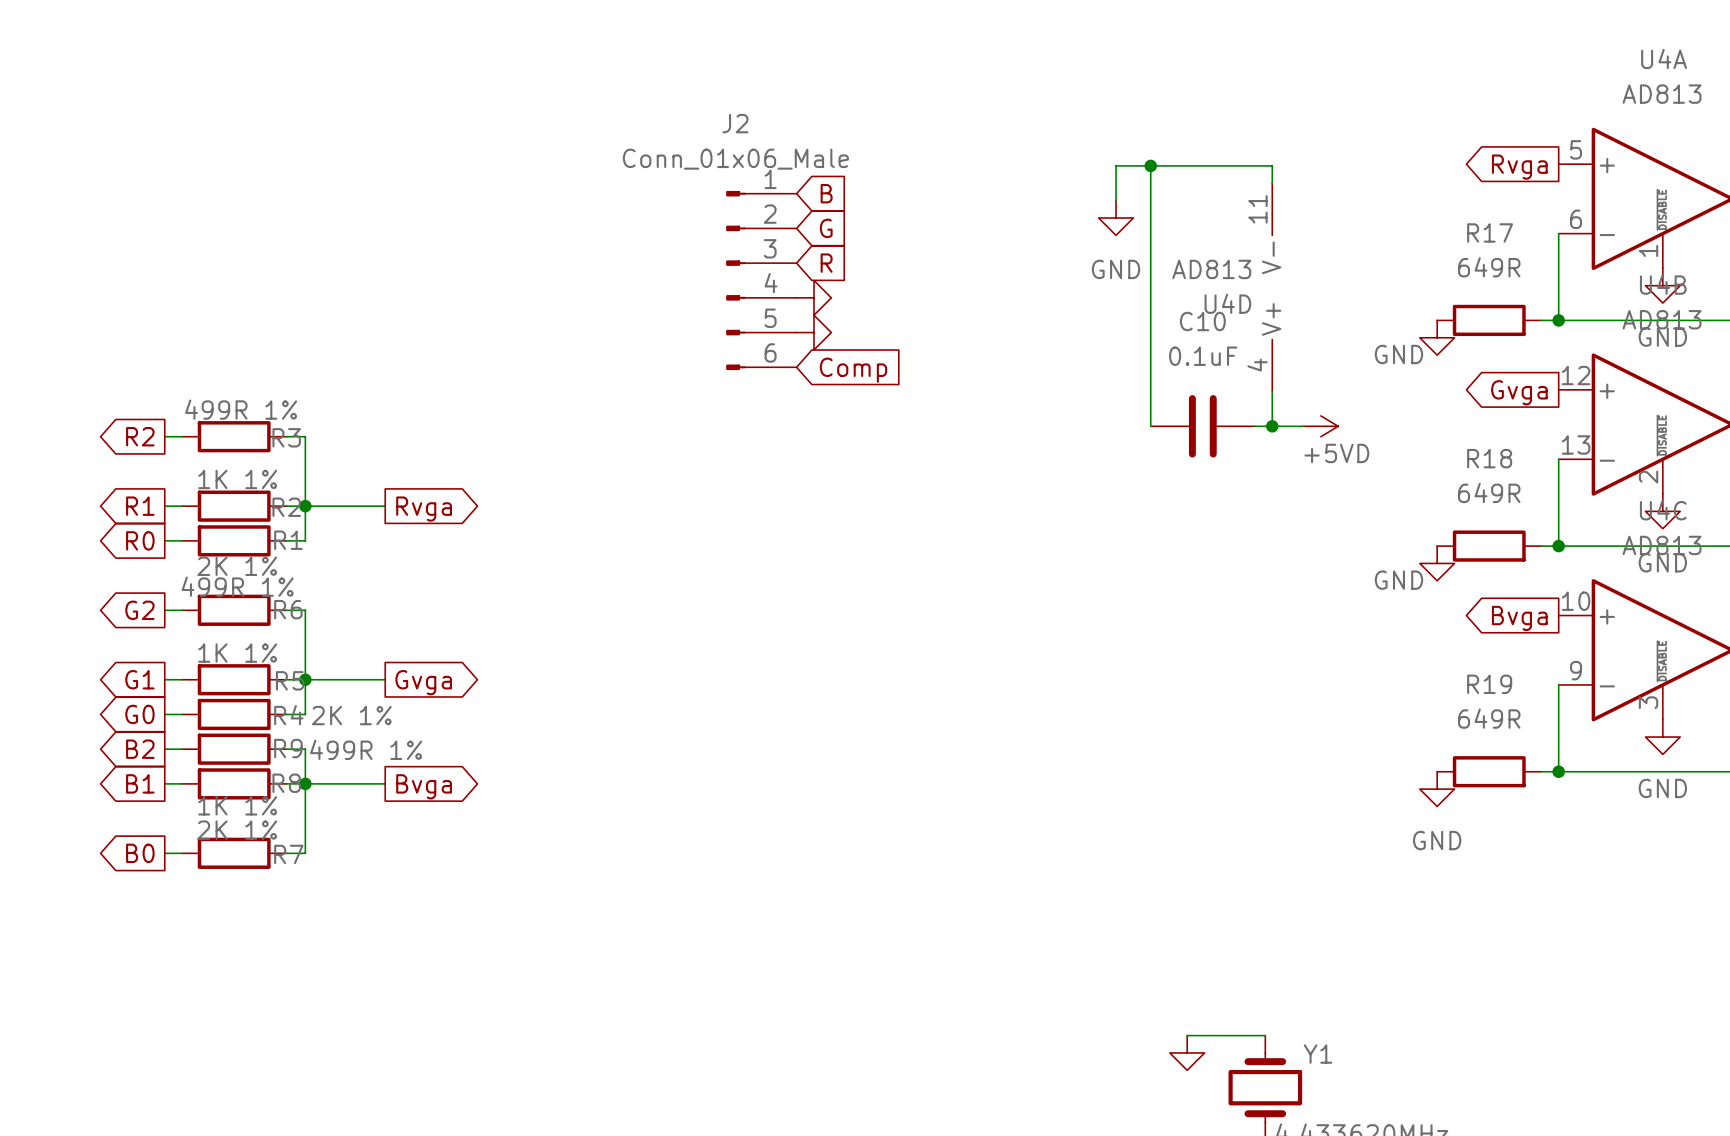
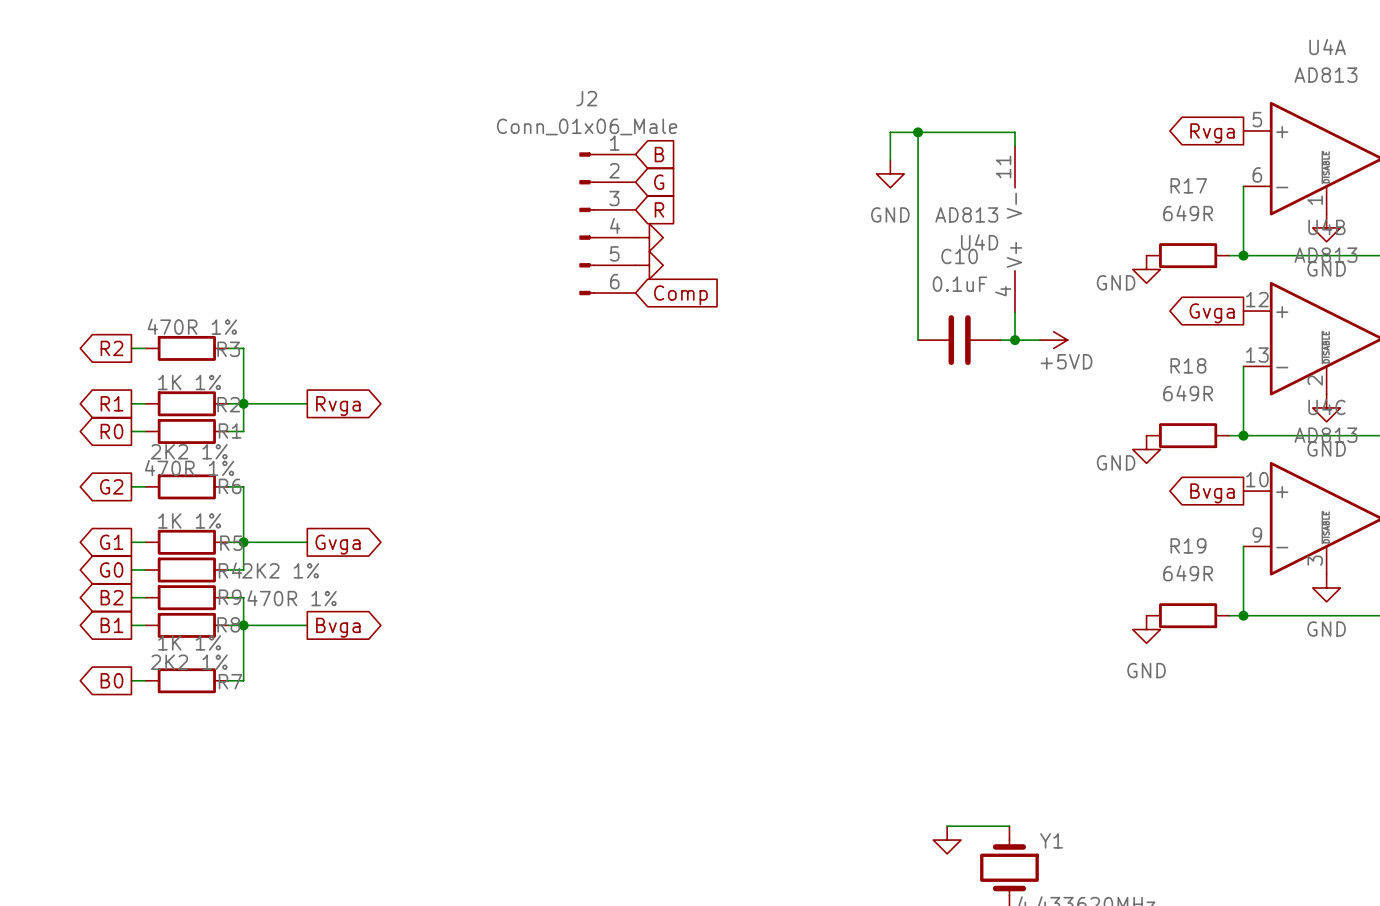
R3 value: 499R 1% (241, 409) -> 470R 1% (192, 326)
R1 value: 2K 1% (237, 566) -> 2K2 1% (189, 451)
R6 value: 499R 1% (237, 586) -> 470R 1% (189, 468)
R4 value: 2K 1% (351, 715) -> 2K2 1% (280, 570)
R9 value: 499R 1% (366, 749) -> 470R 1% (292, 598)
R7 value: 2K 1% (237, 830) -> 2K2 1% (189, 662)

